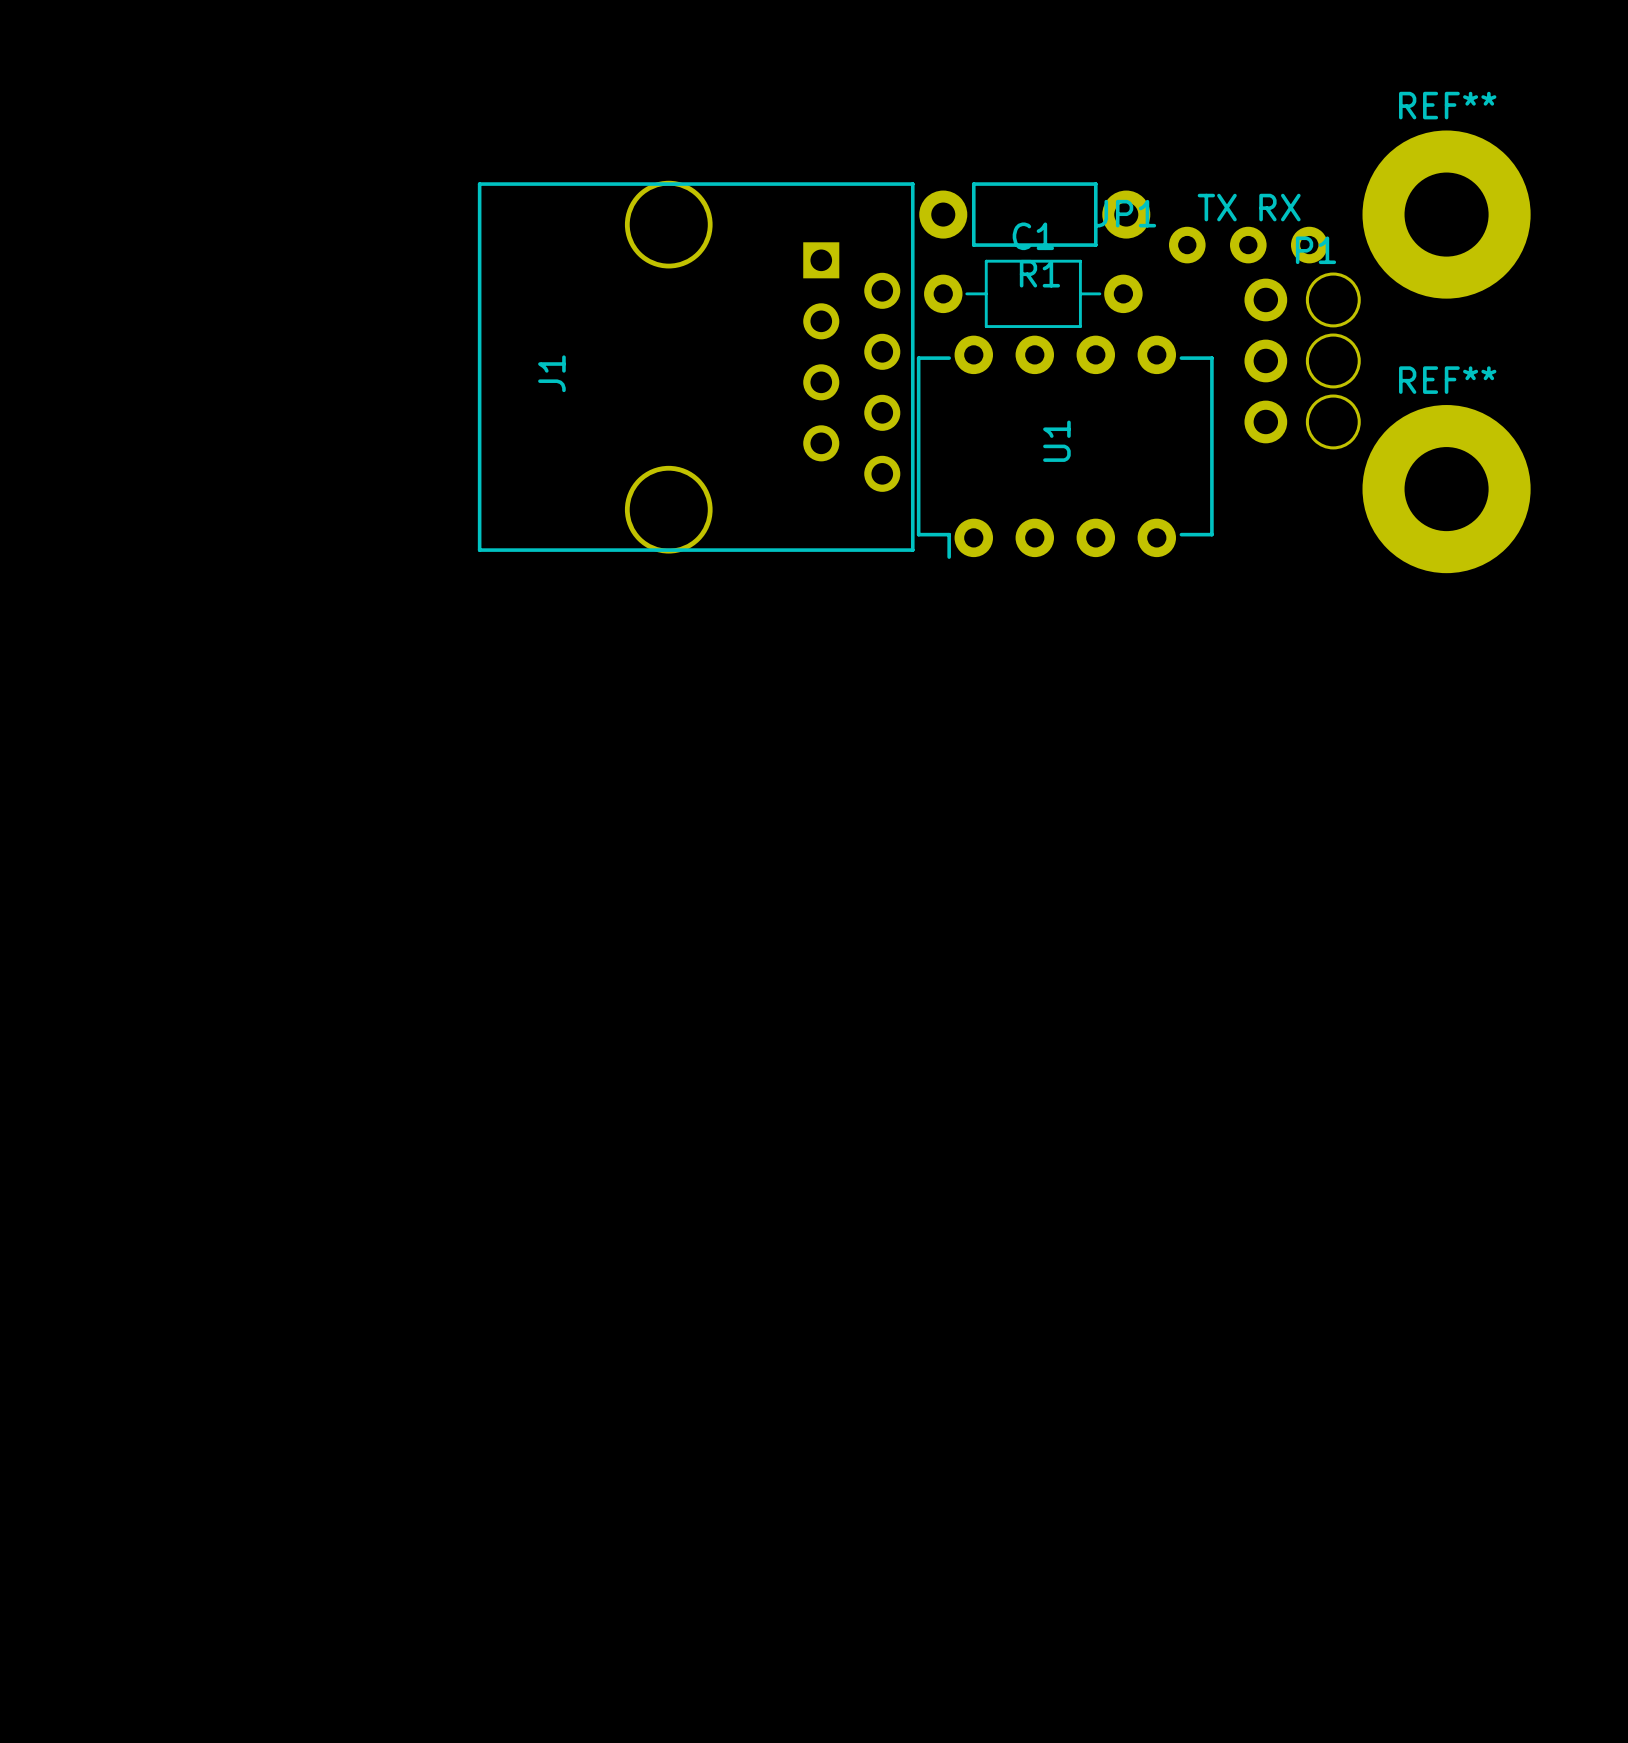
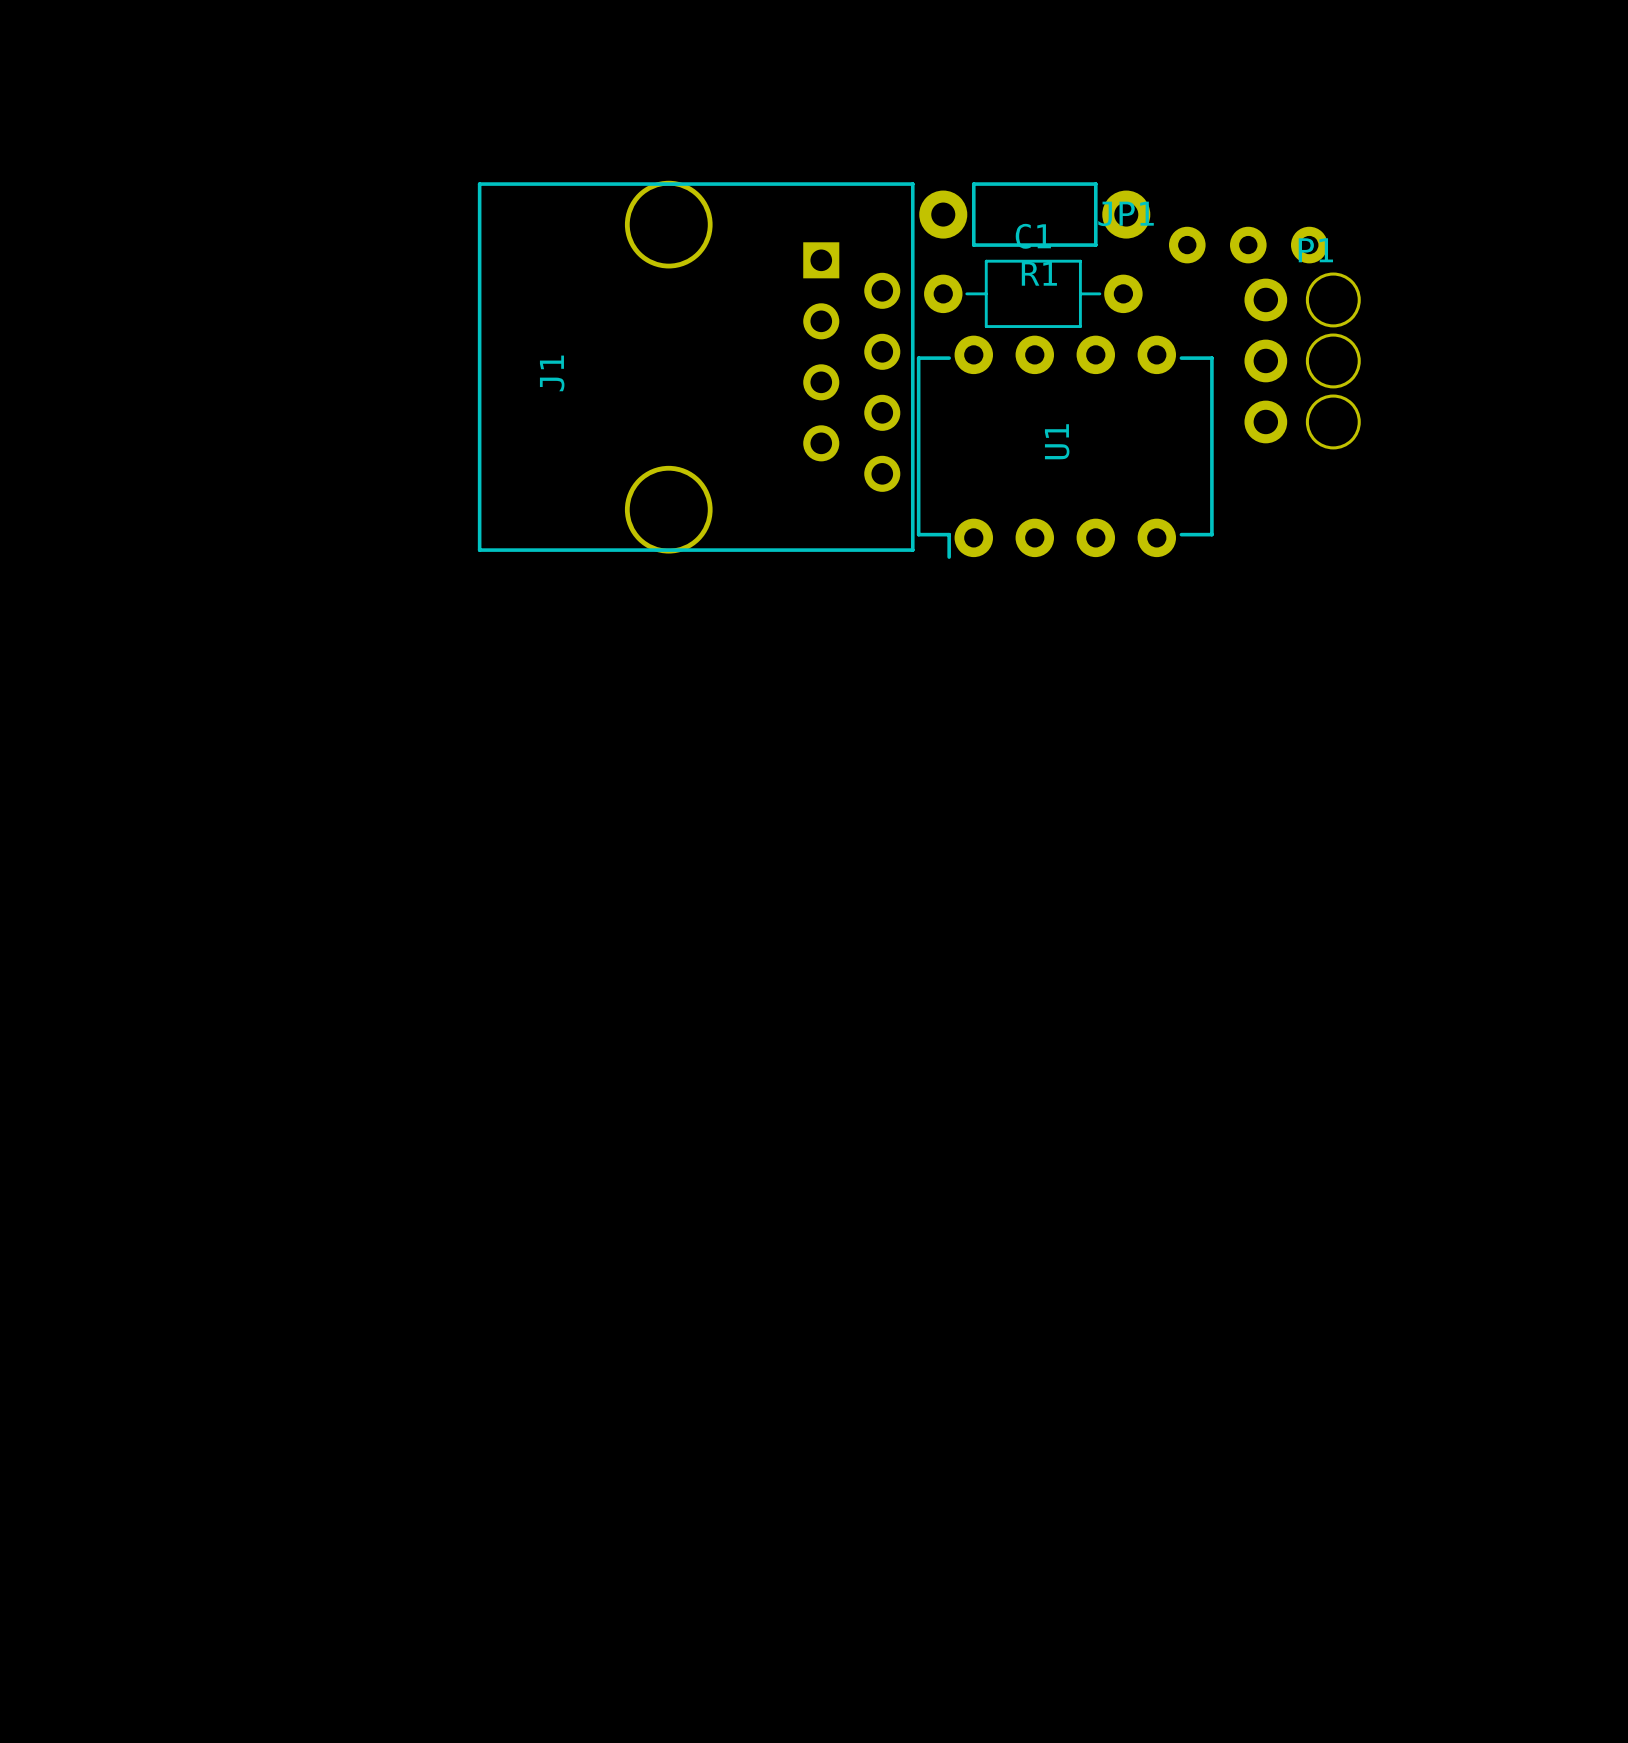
text: TX (1217, 207) -> none
text: RX (1279, 207) -> none
REF**: (1446, 214) -> none
REF**: (1446, 489) -> none

